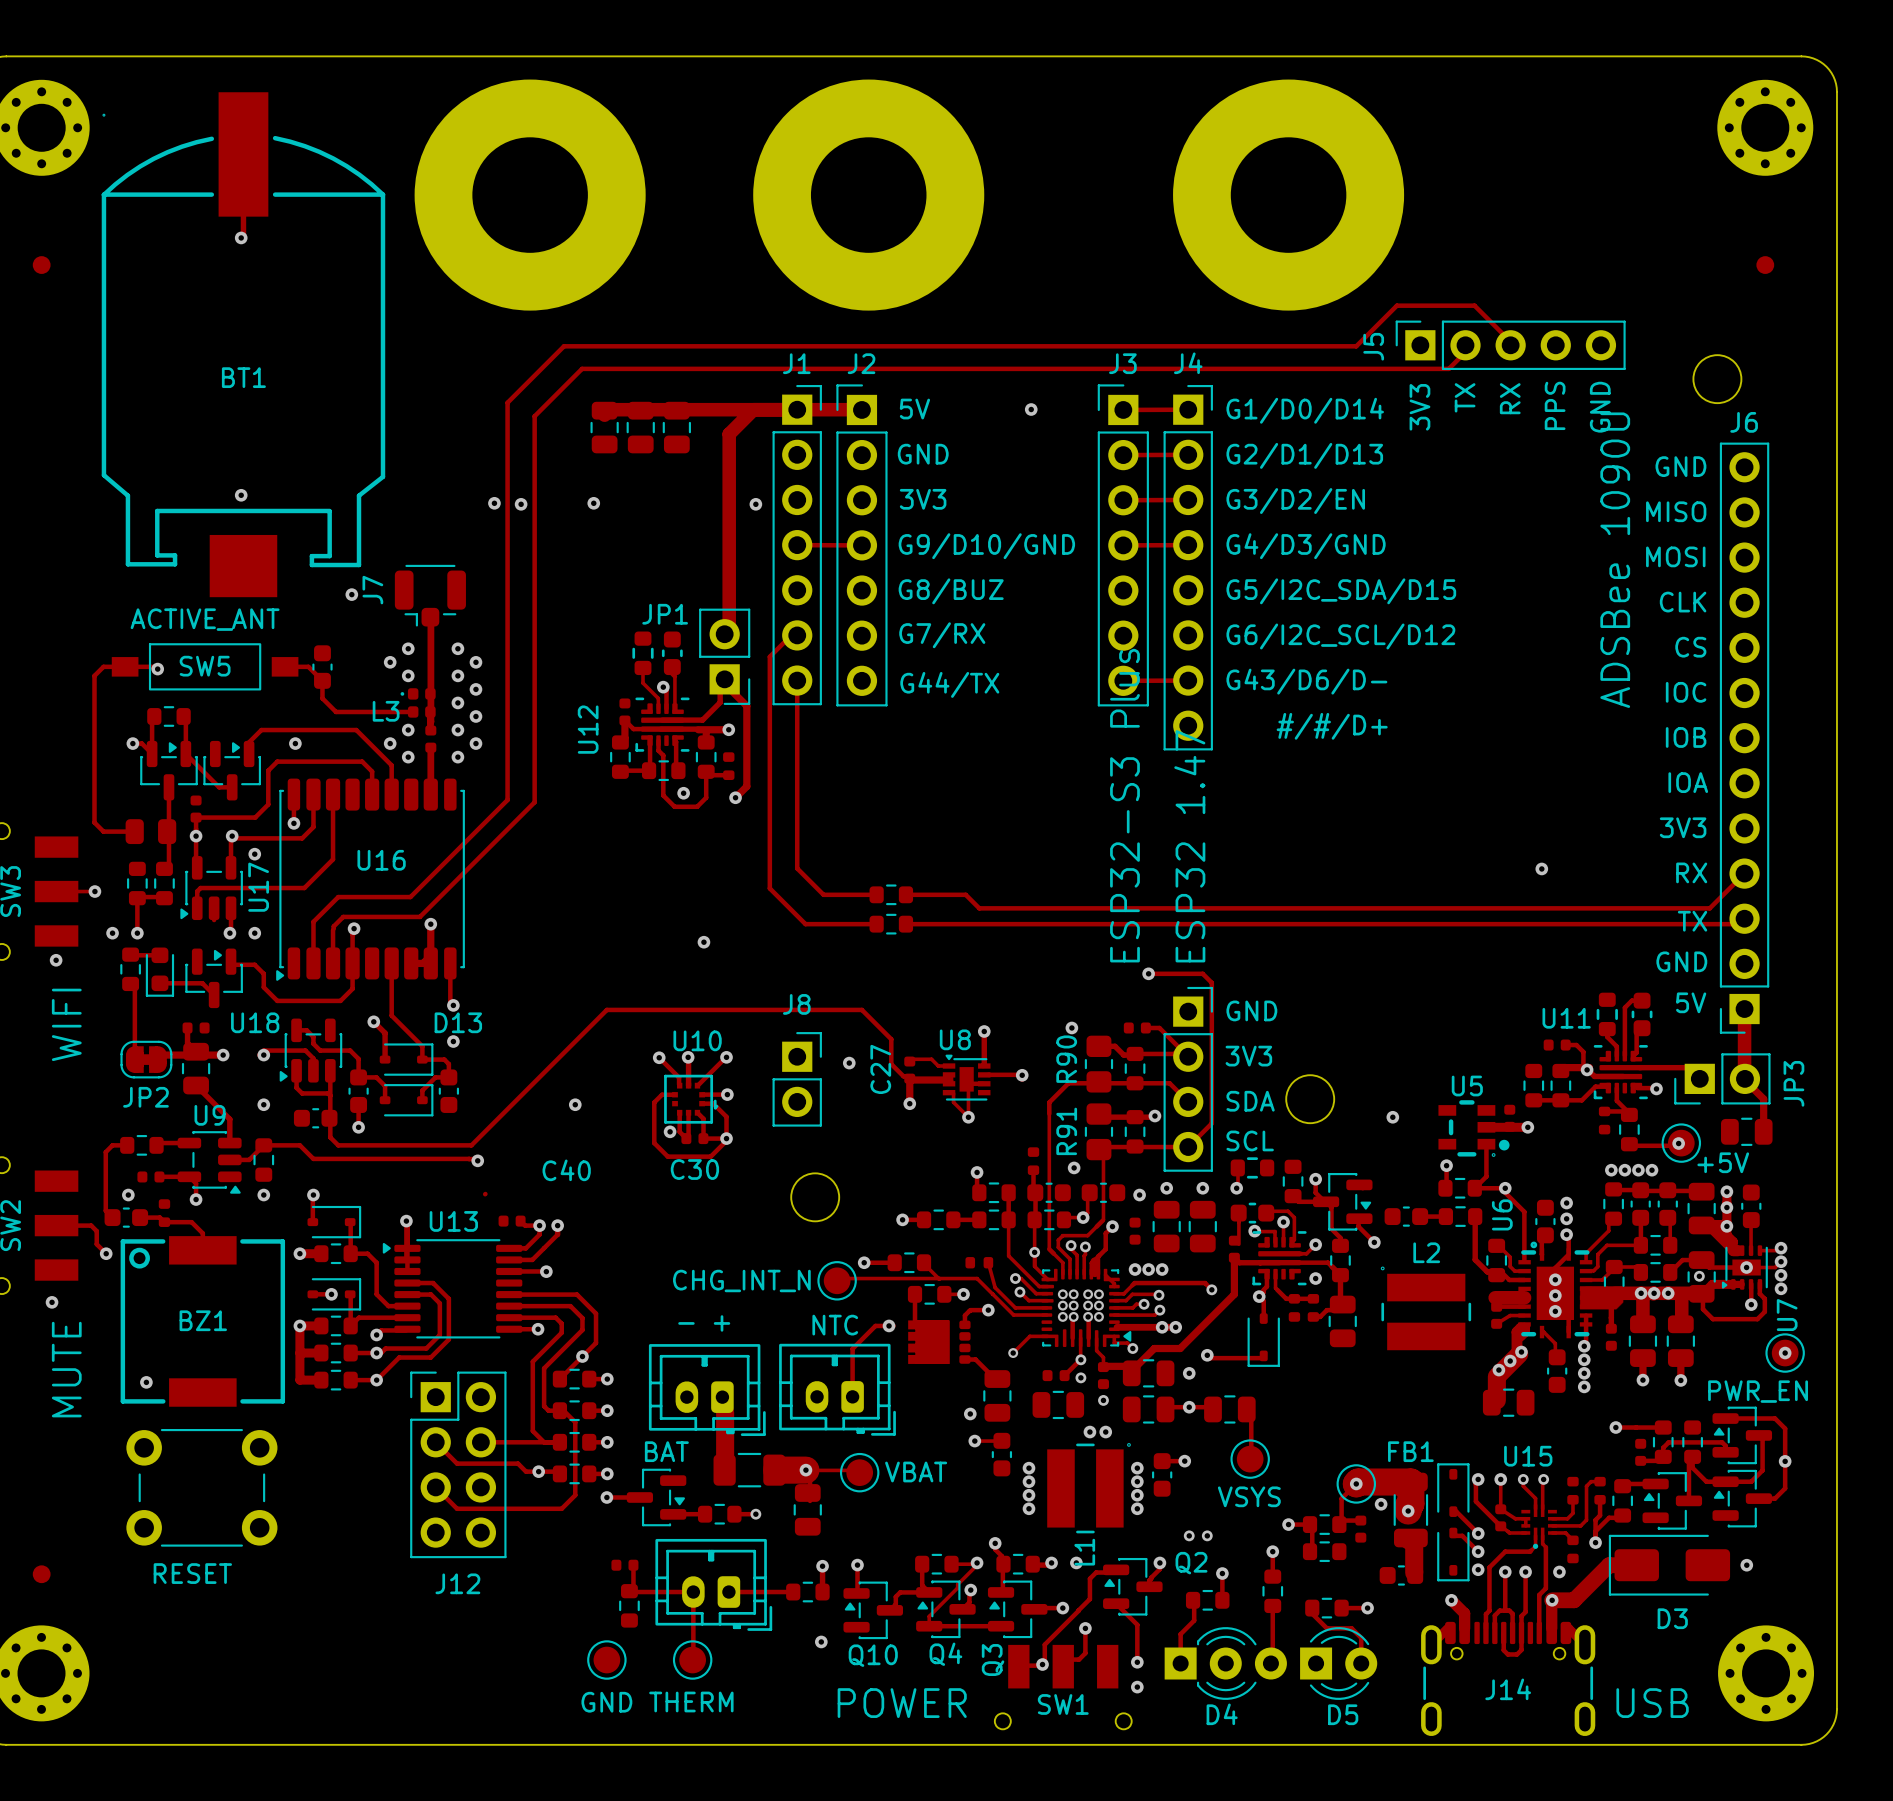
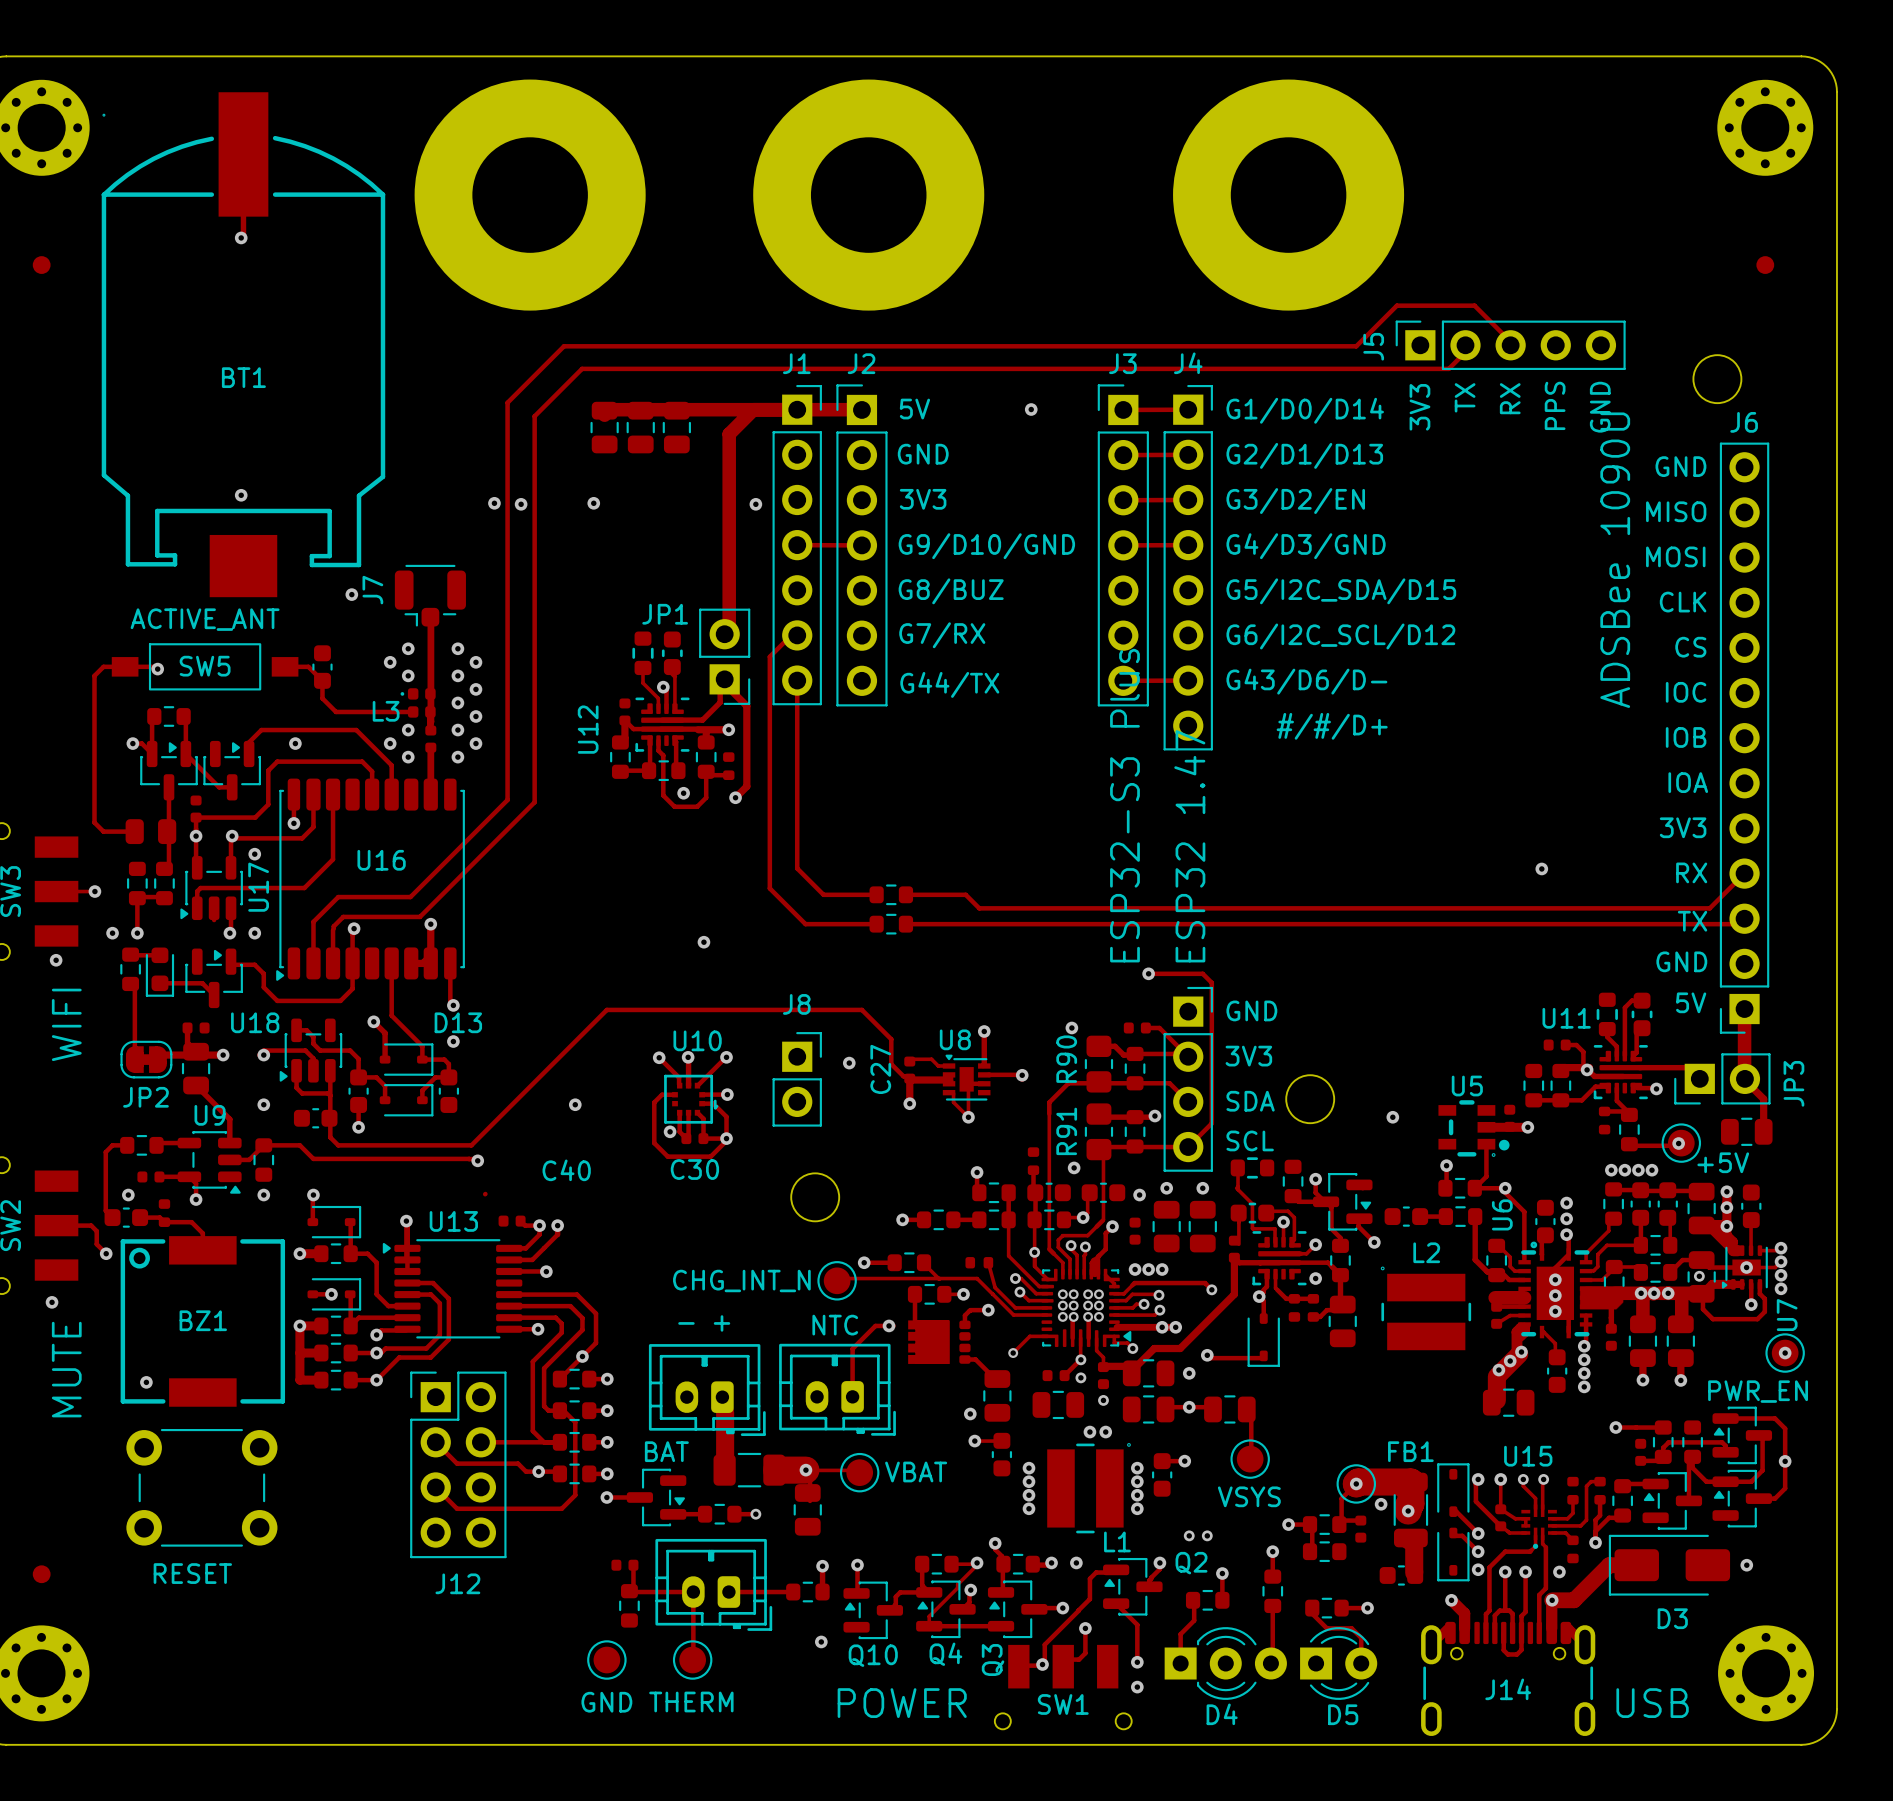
via: (1236, 1188) -> none
track: (1254, 1231) (1275, 1231) -> (1238, 1186) (1238, 1189) (1252, 1204) (1252, 1228) (1275, 1228) (1275, 1231)
via: (1254, 1231) -> none
L1 name rotation: 0° (1084, 1552) -> 90° clockwise (1117, 1541)

